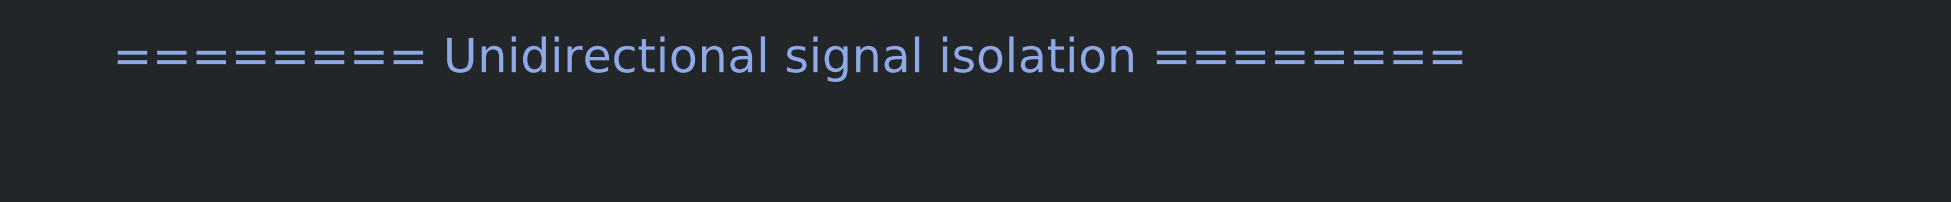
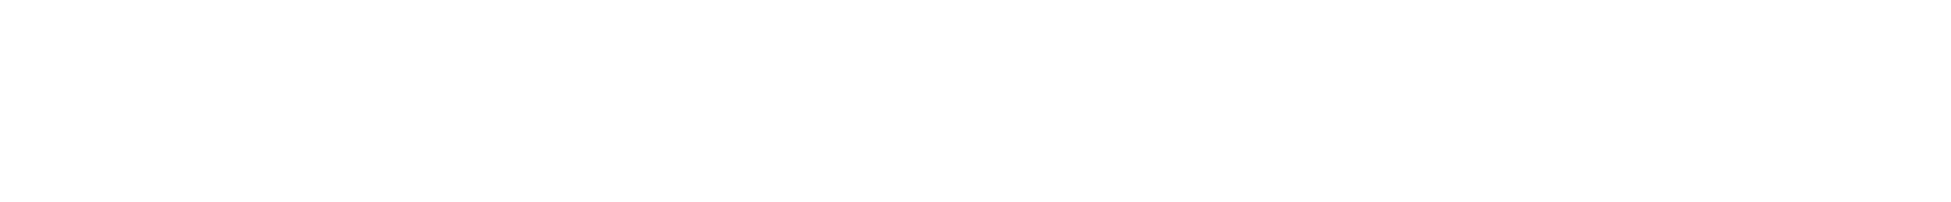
text: ======== Unidirectional signal isolation ======== (789, 59) -> none

